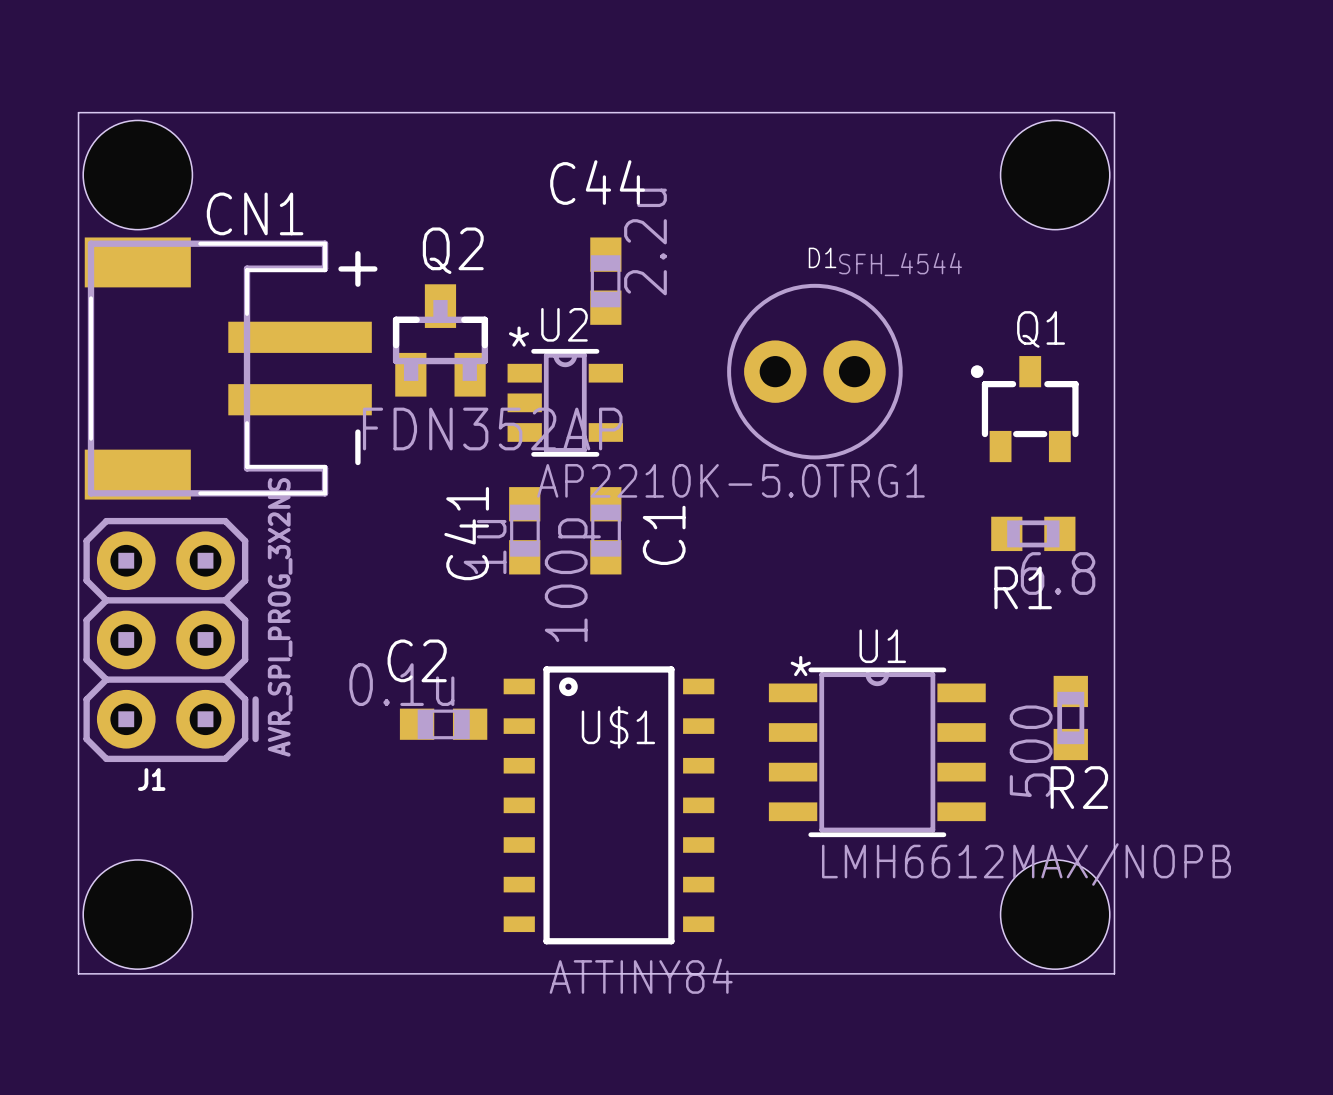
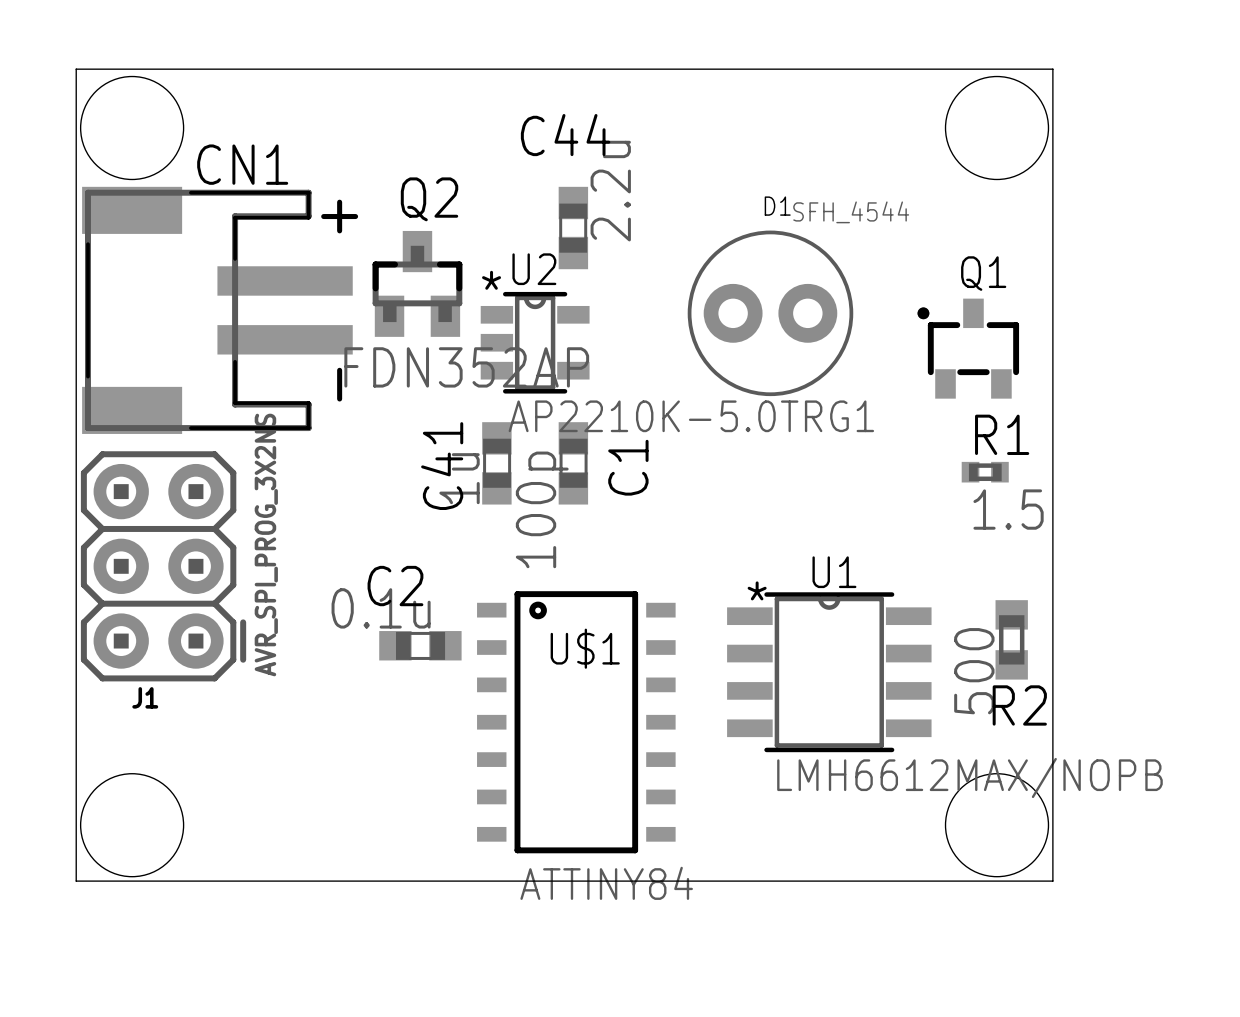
R1 footprint: [991, 516, 1076, 552] -> [961, 461, 1009, 483]
R1 value: 6.8 (1058, 573) -> 1.5 (1008, 509)
R1 name position: R1 (1023, 587) -> R1 (1002, 434)

